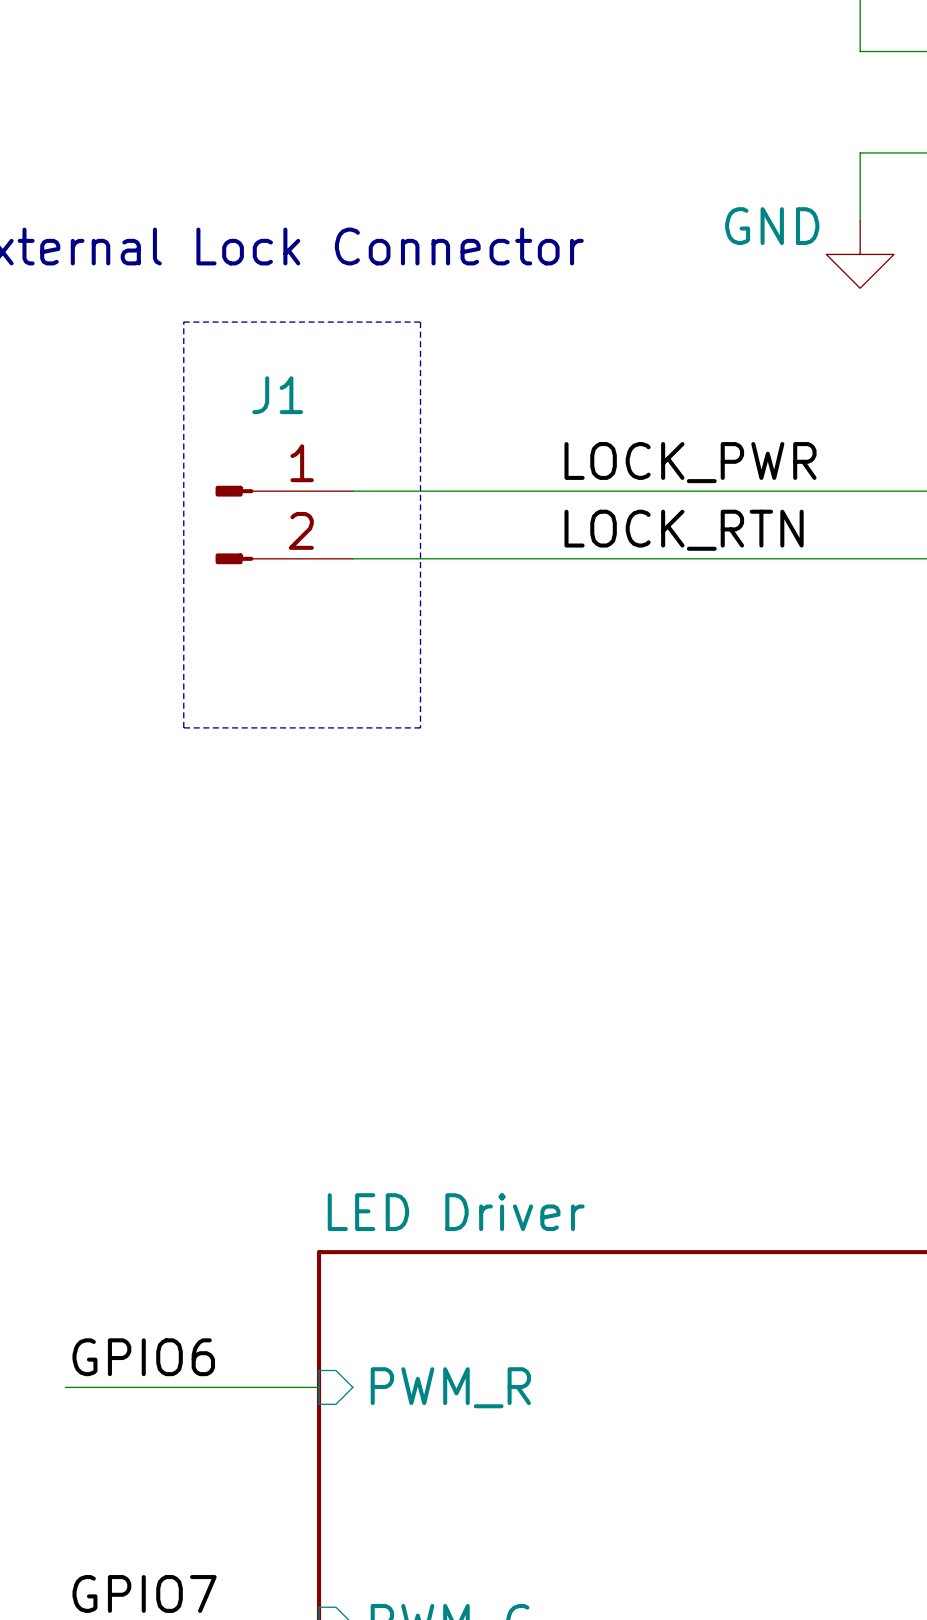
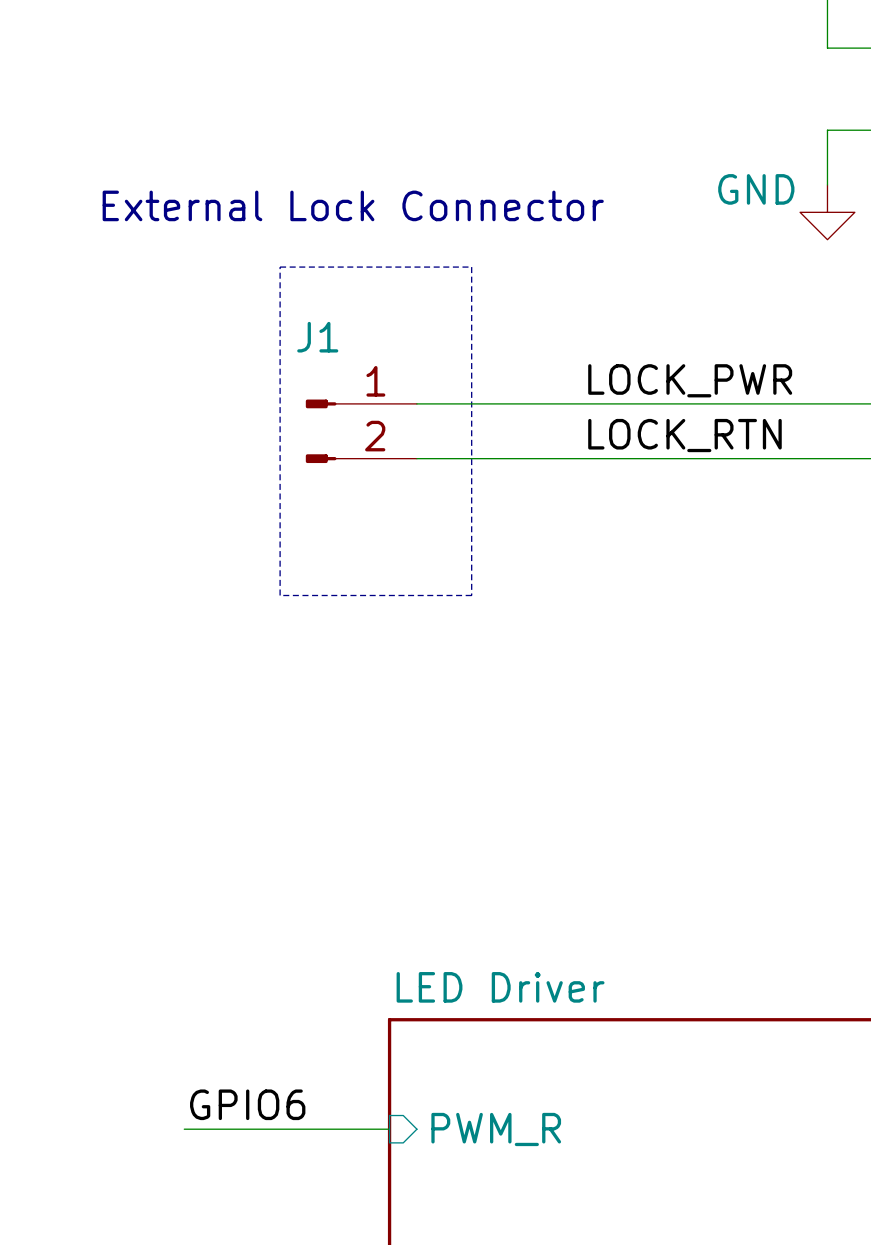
J1 name position: J1 (277, 395) -> J1 (317, 337)

